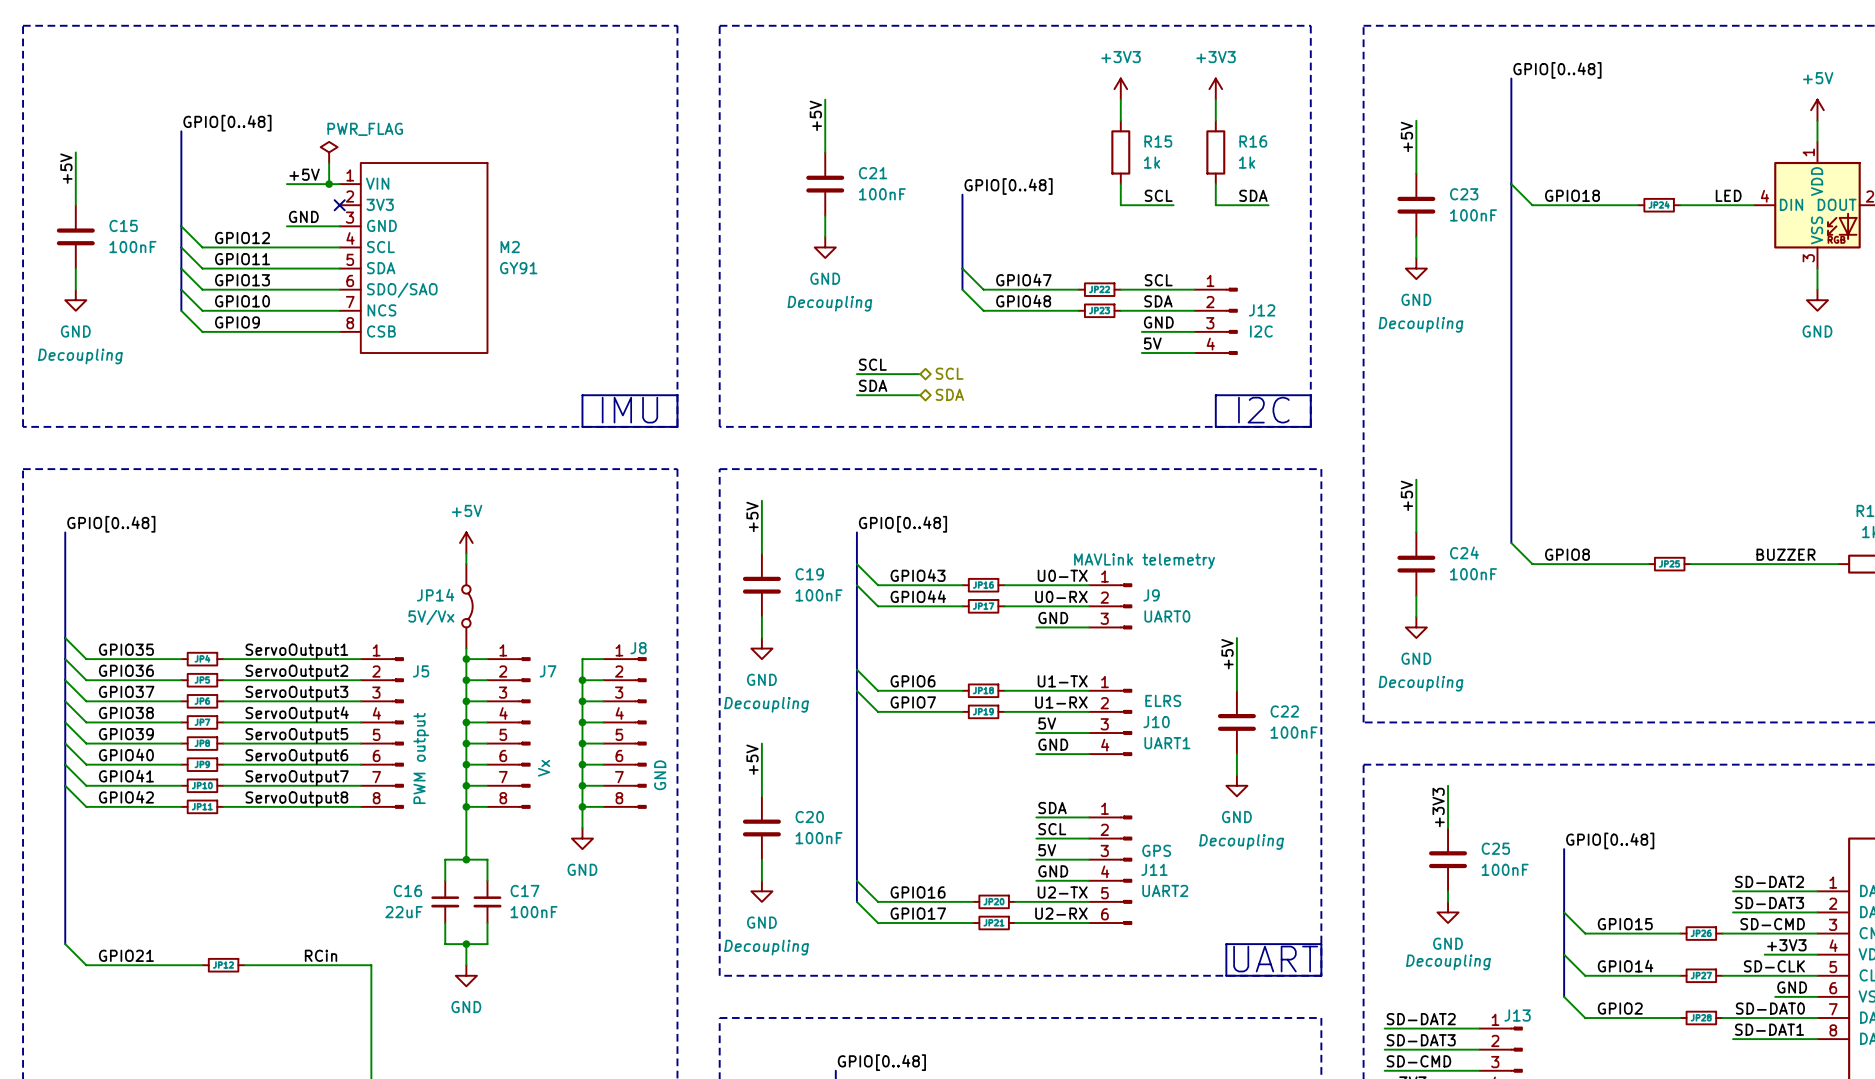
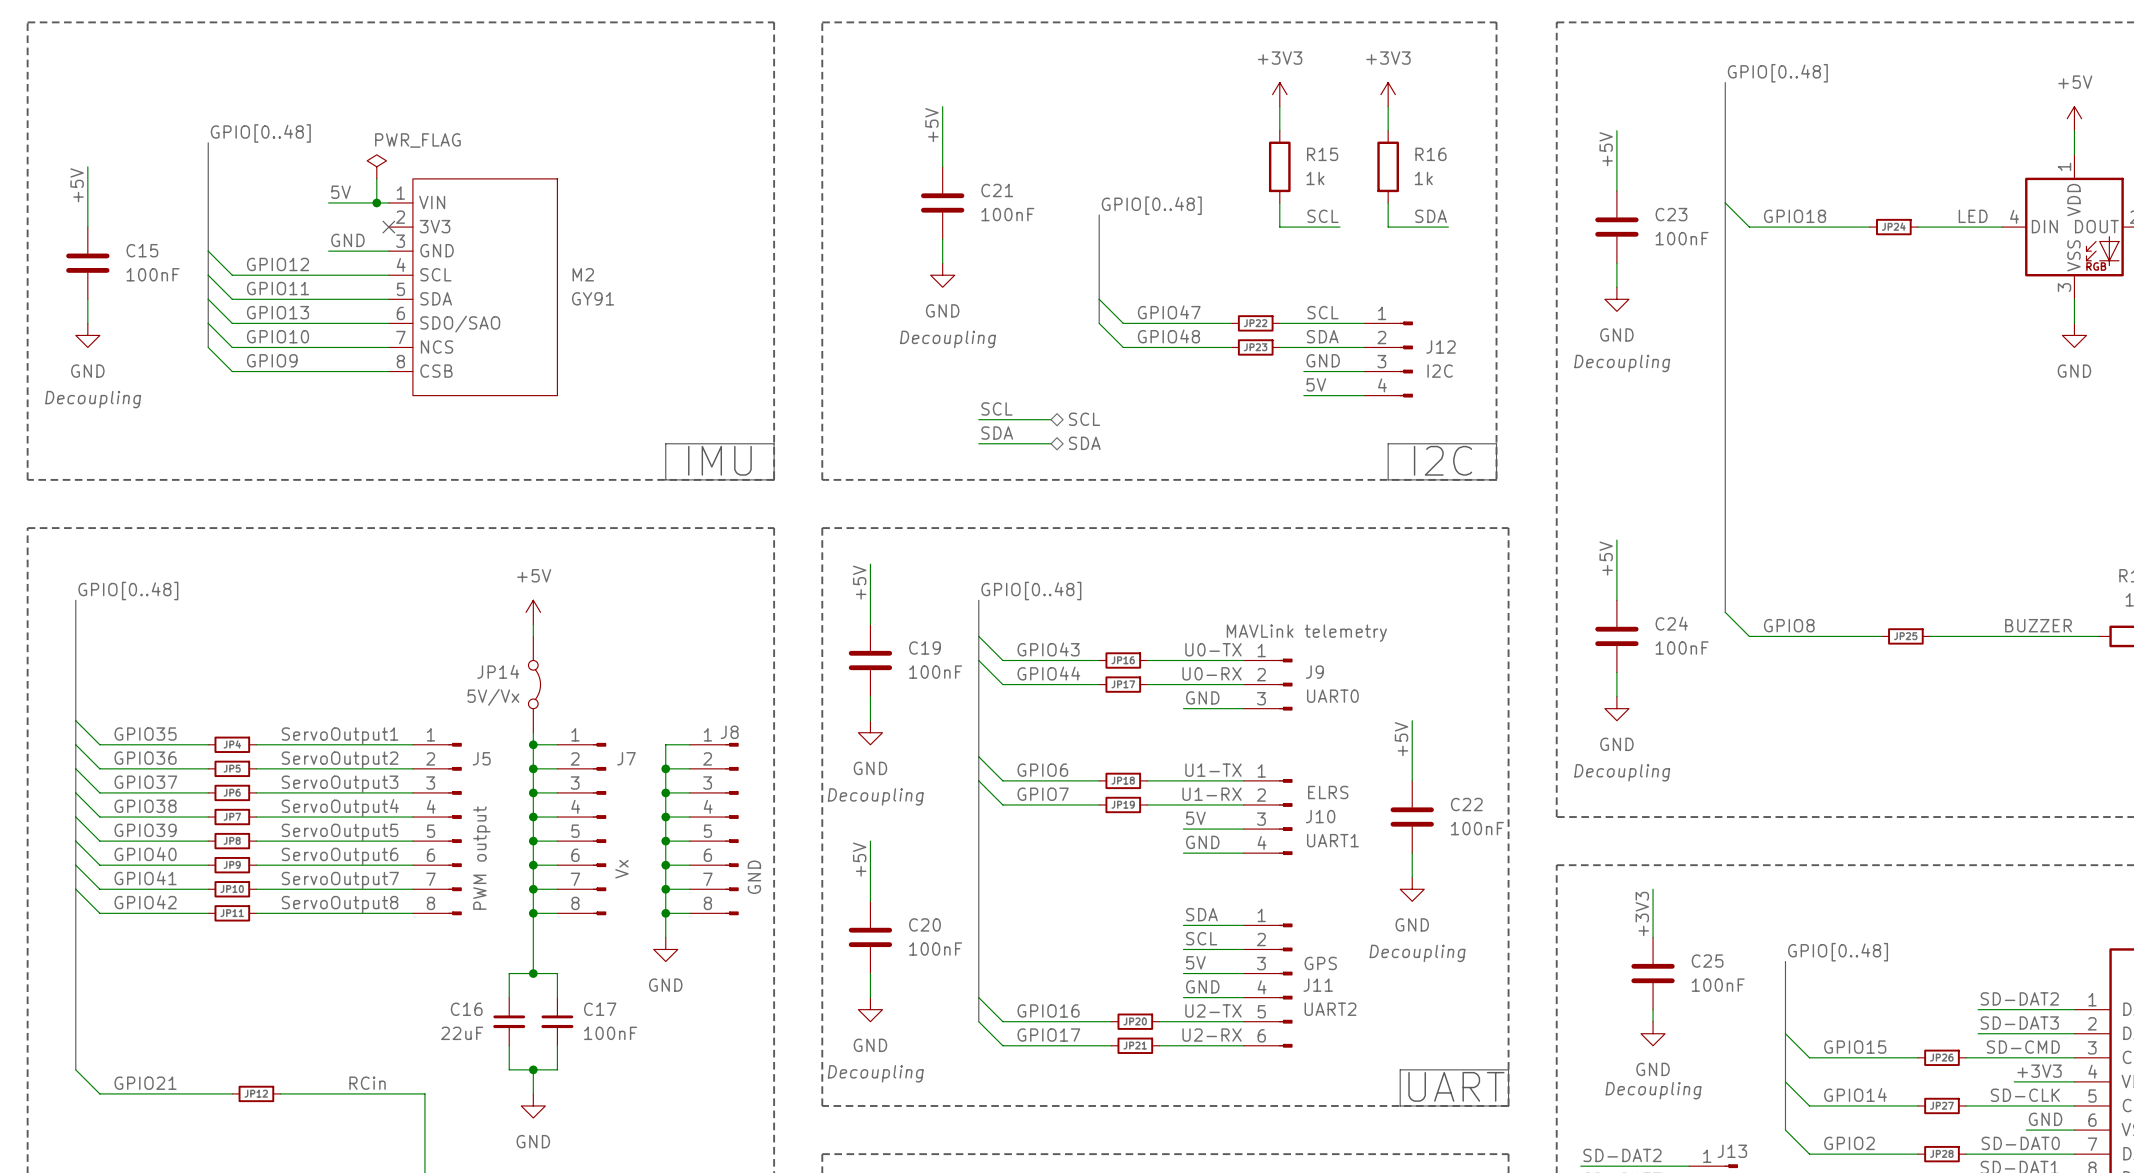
label: +5V (304, 174) -> 5V (341, 192)

